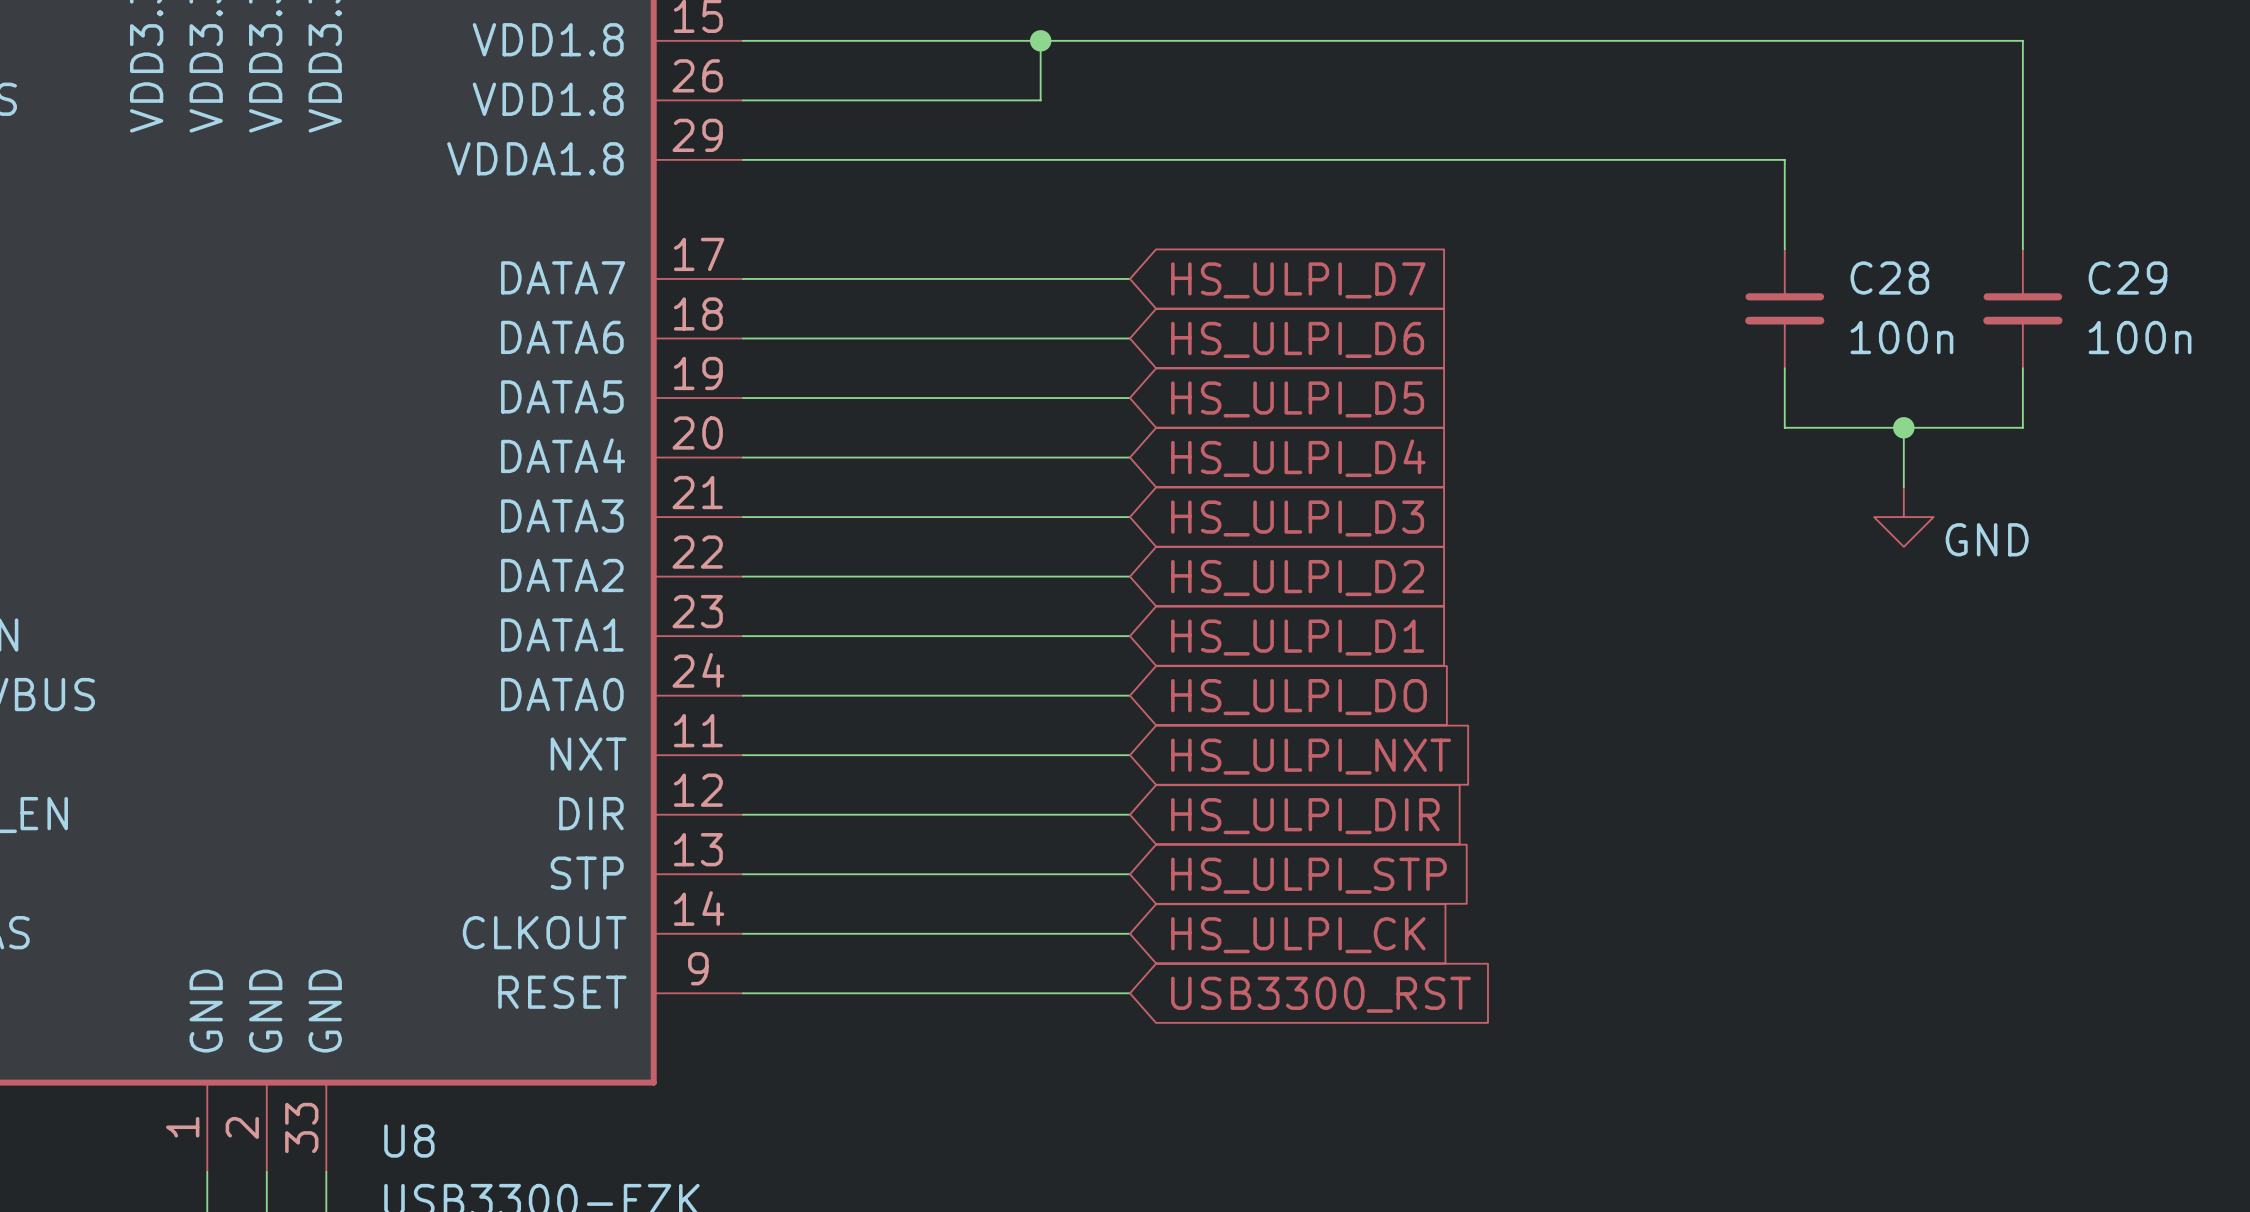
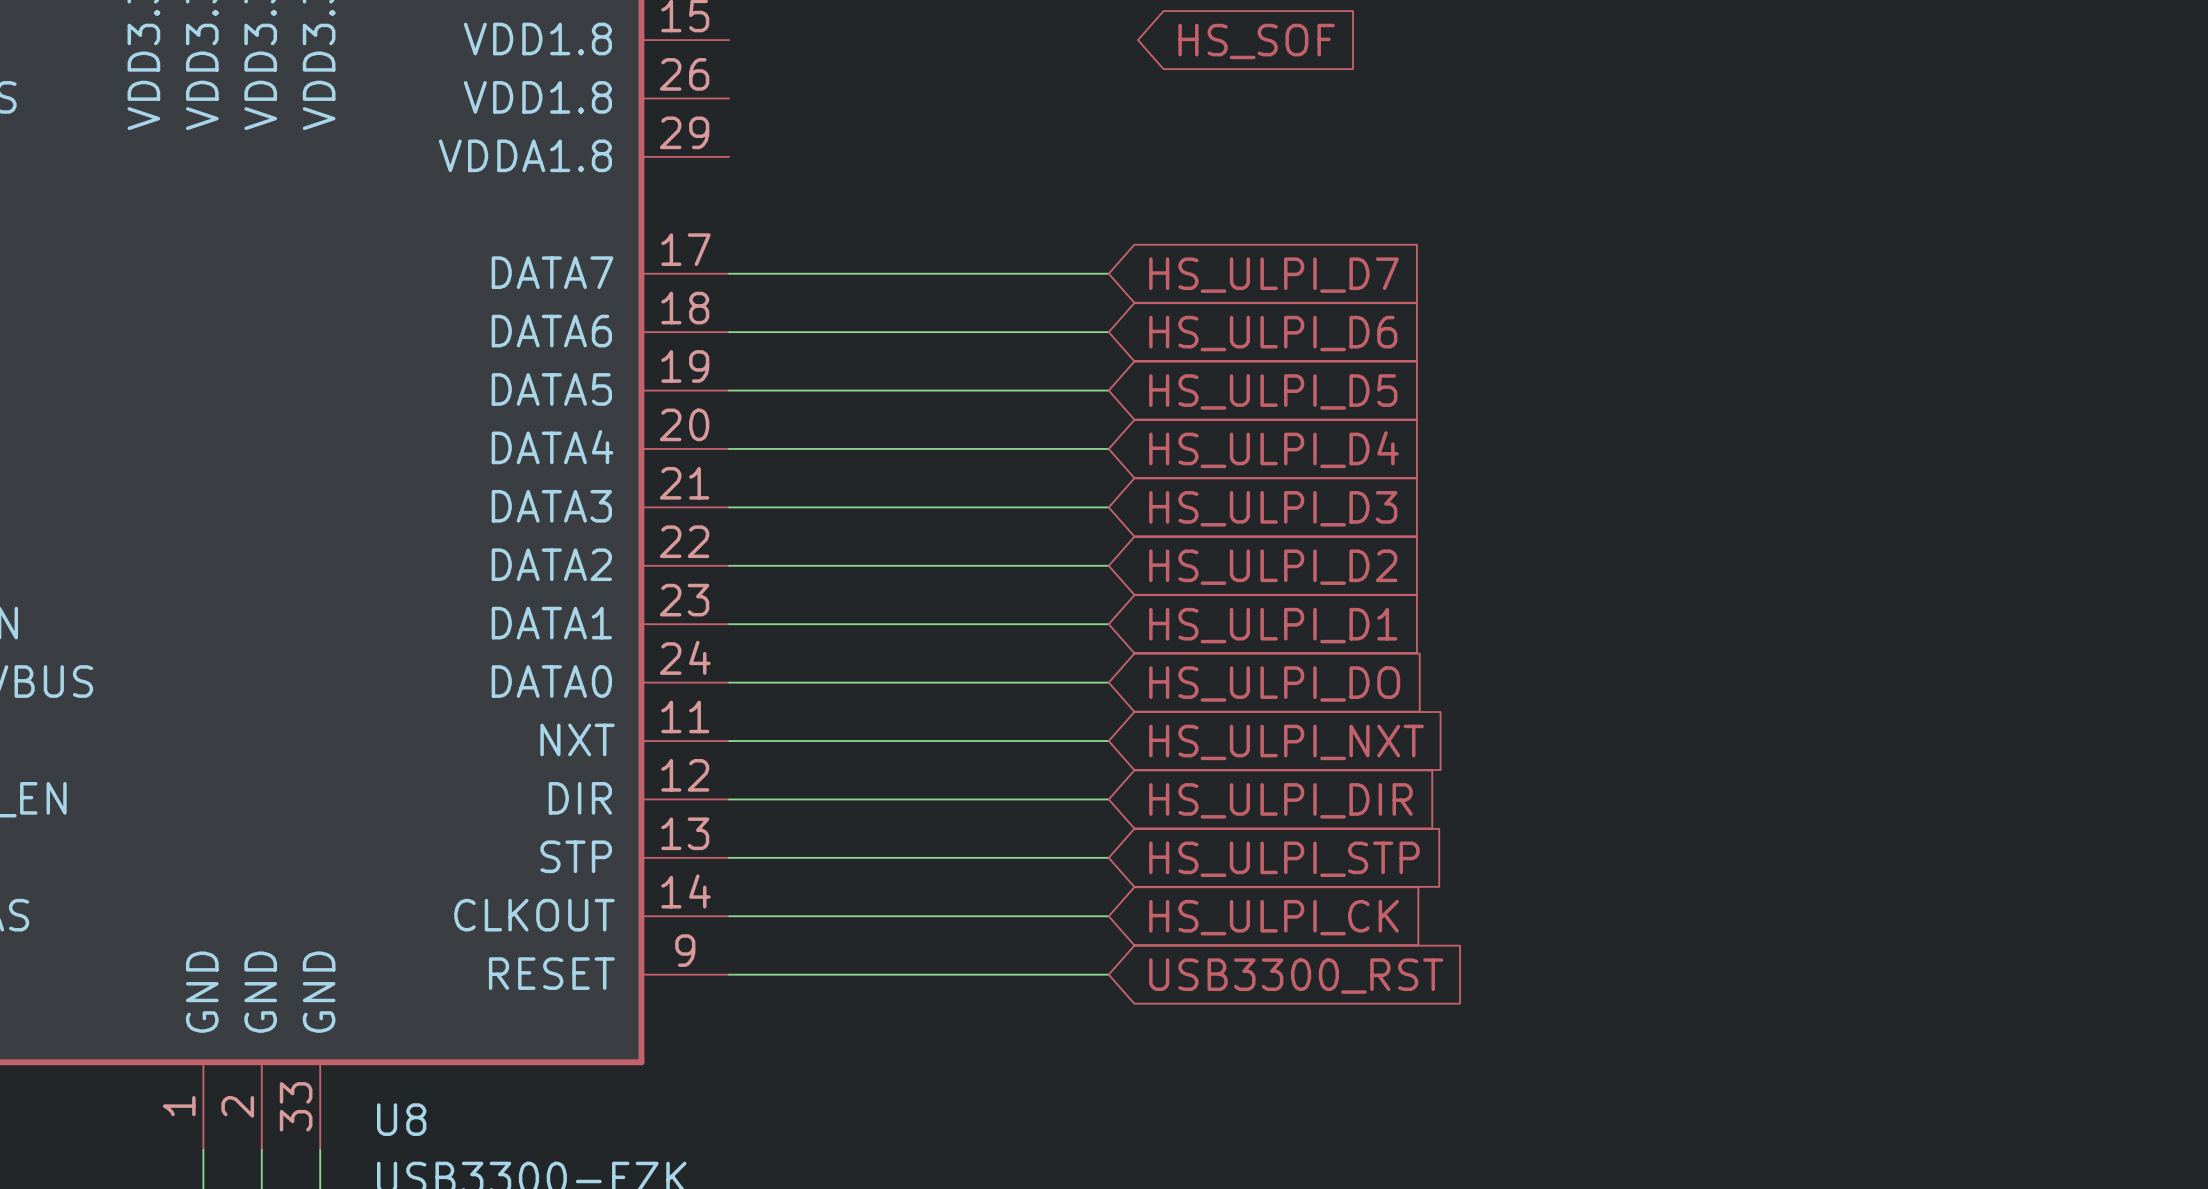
wire: (743, 40) (2022, 40) (2022, 249) -> none
wire: (1040, 40) (1040, 100) (743, 100) -> none
junction: (1040, 40) -> none
global label: none -> HS_SOF (1256, 41)
wire: (743, 159) (1784, 159) (1784, 249) -> none
C28: 100n (1784, 308) -> none
C29: 100n (2022, 308) -> none
wire: (1784, 368) (1784, 427) (2022, 427) (2022, 368) -> none
wire: (1903, 427) (1903, 487) -> none
junction: (1903, 427) -> none
power symbol: GND (1903, 517) -> none

